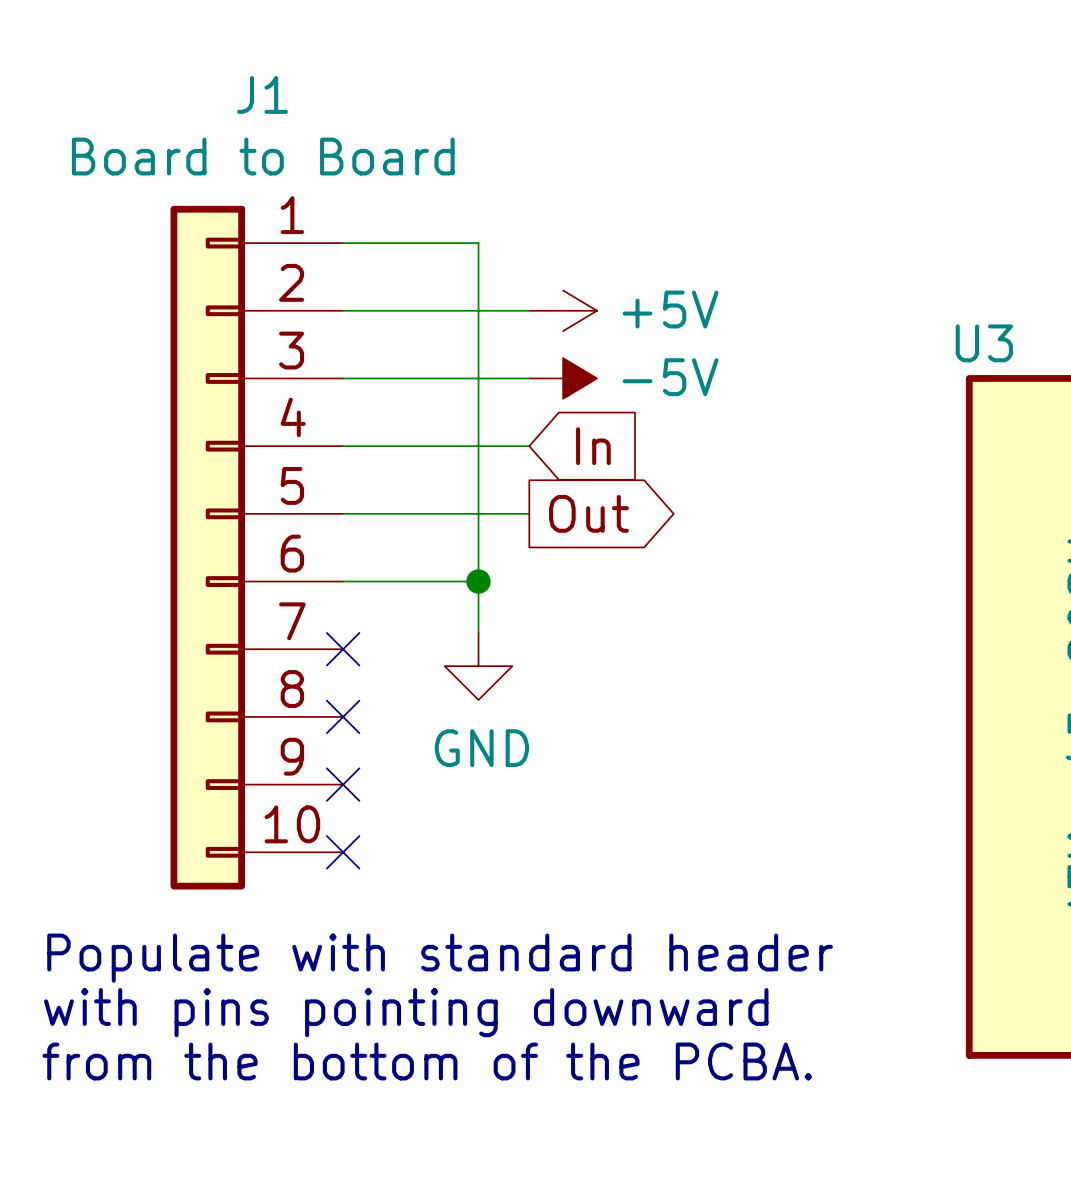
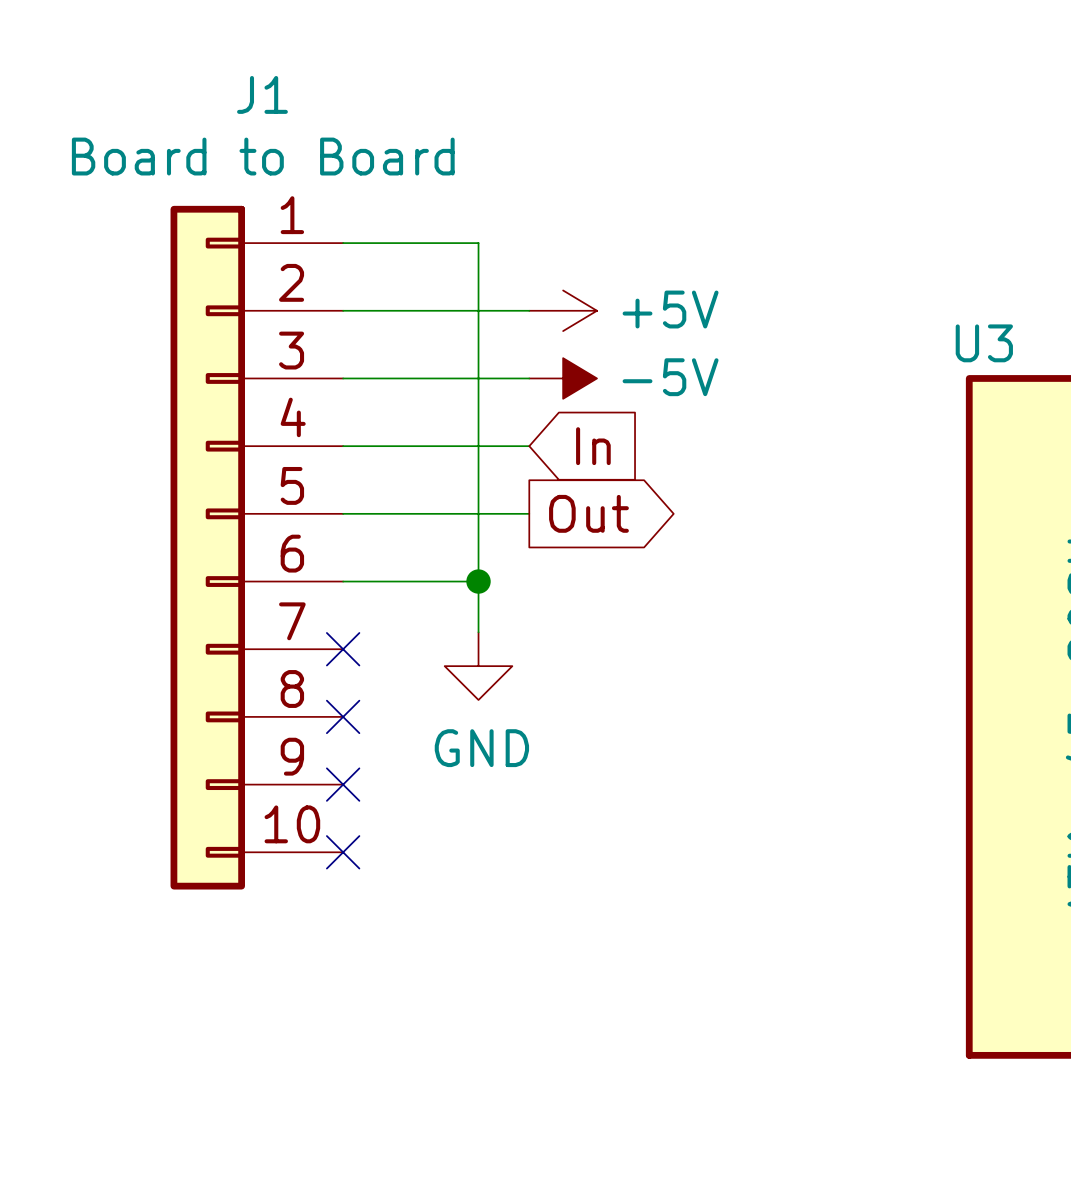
text: Populate with standard header (440, 958) -> none
text: with pins pointing downward (406, 1012) -> none
text: from the bottom of the PCBA. (427, 1061) -> none

